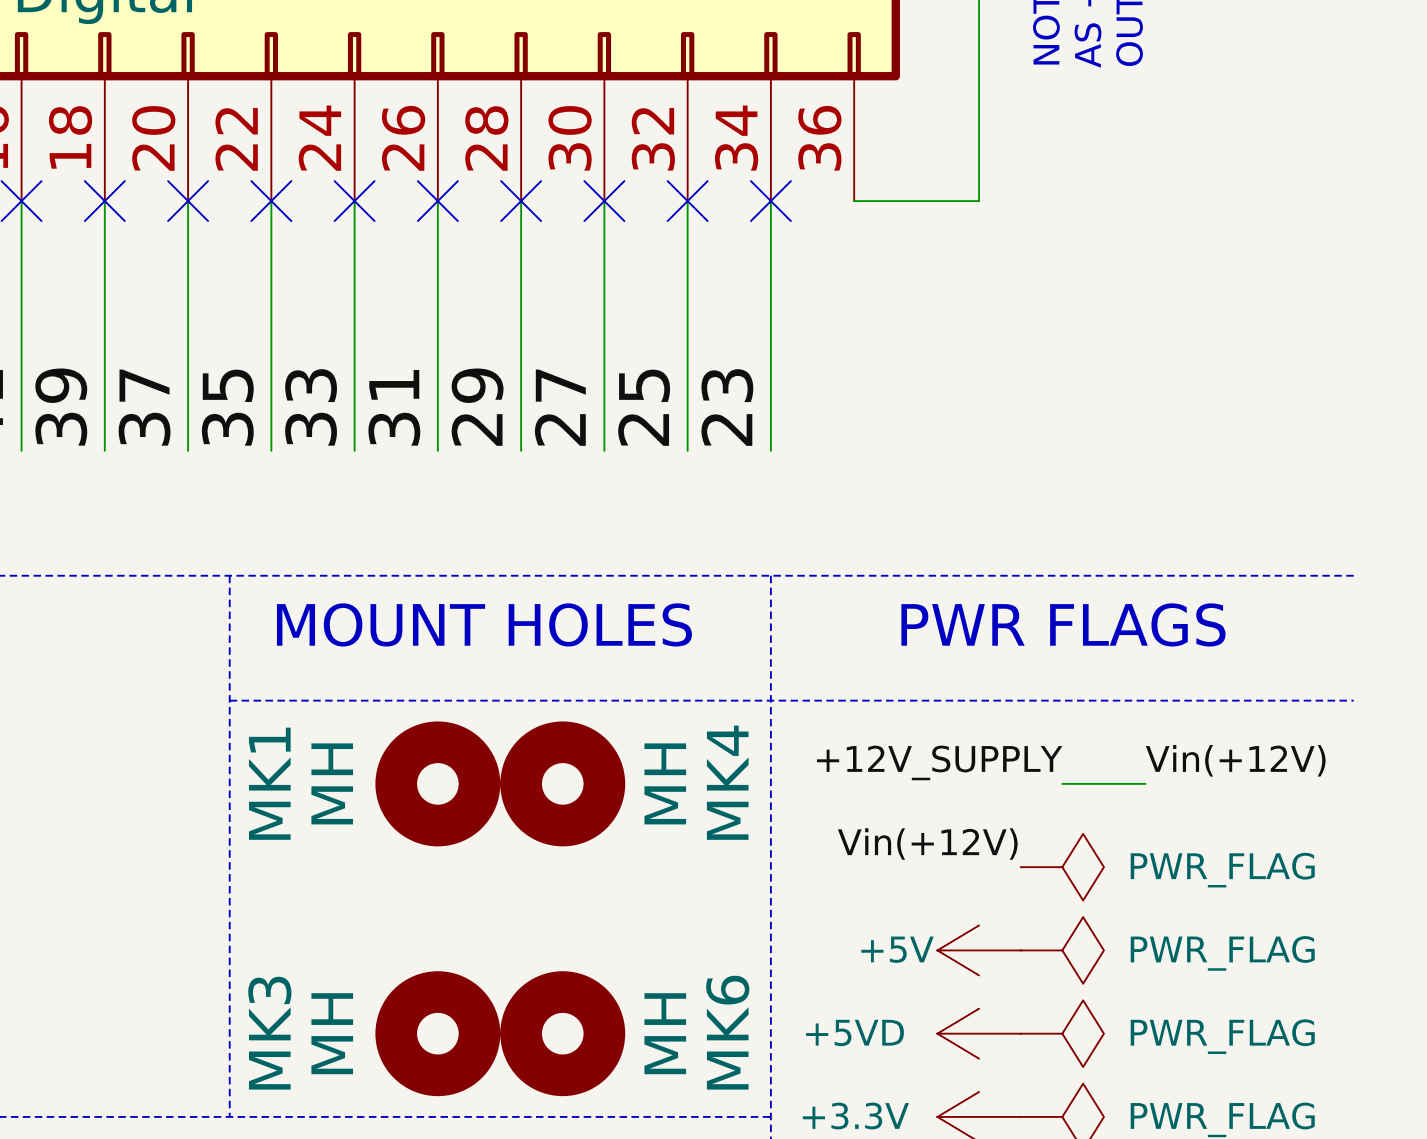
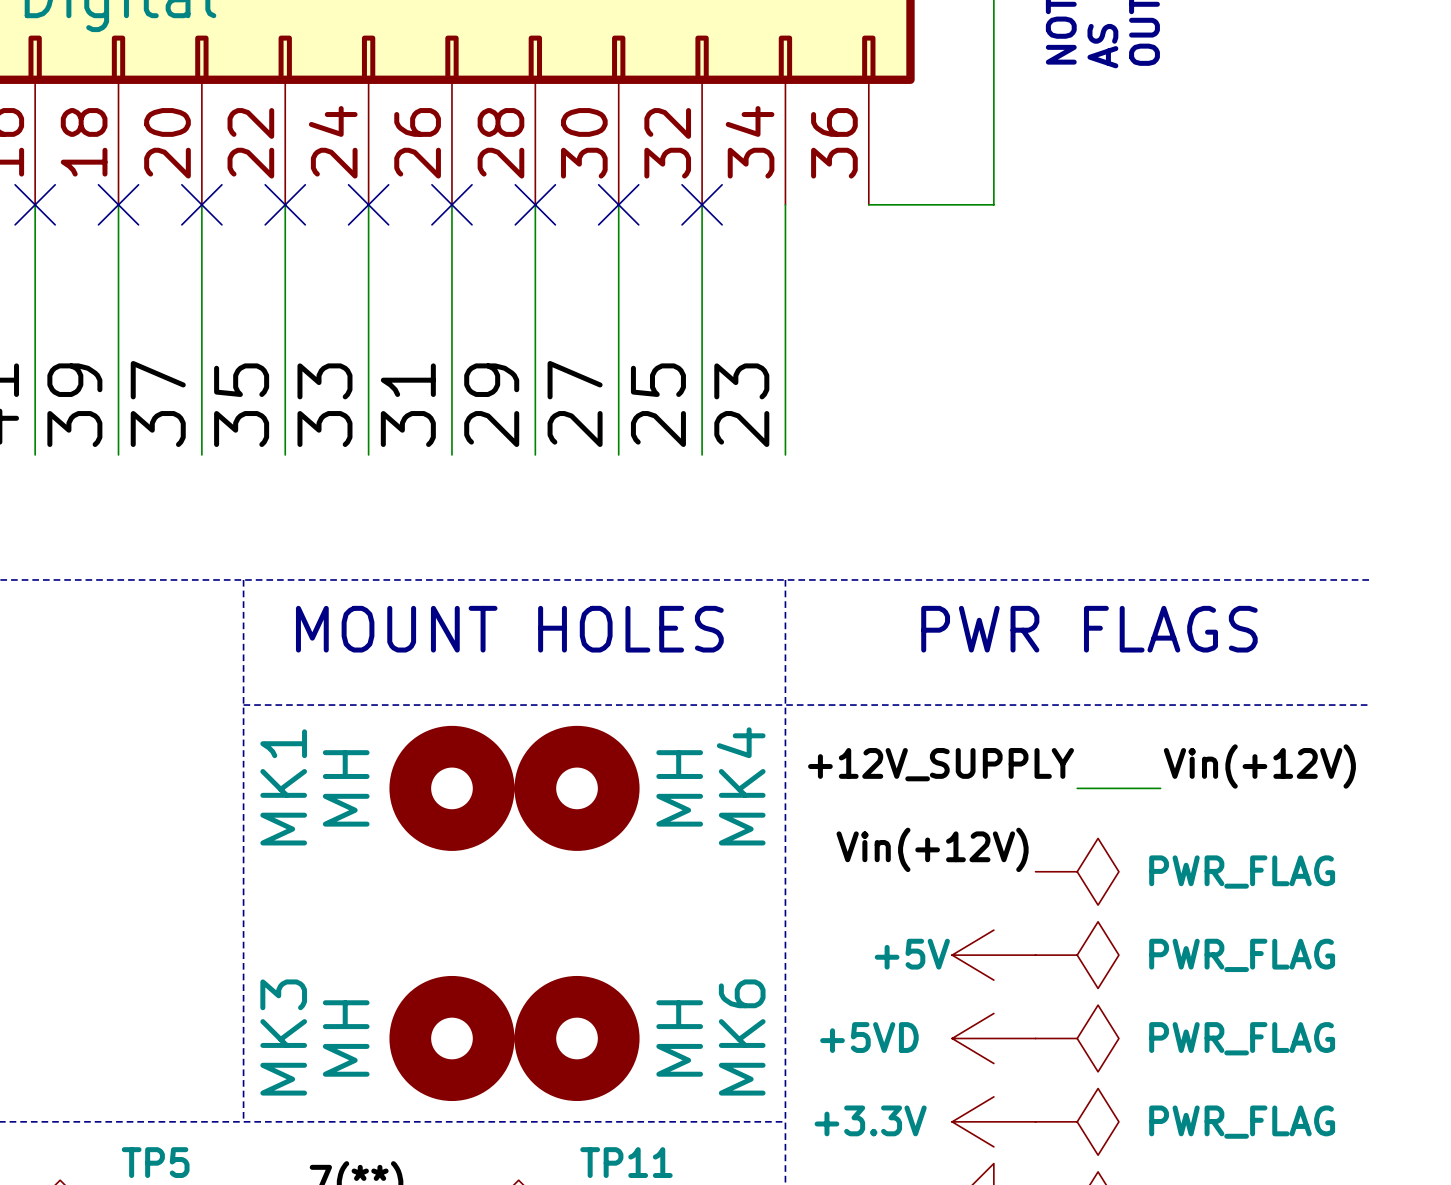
no-connect mark: (770, 201) -> none

